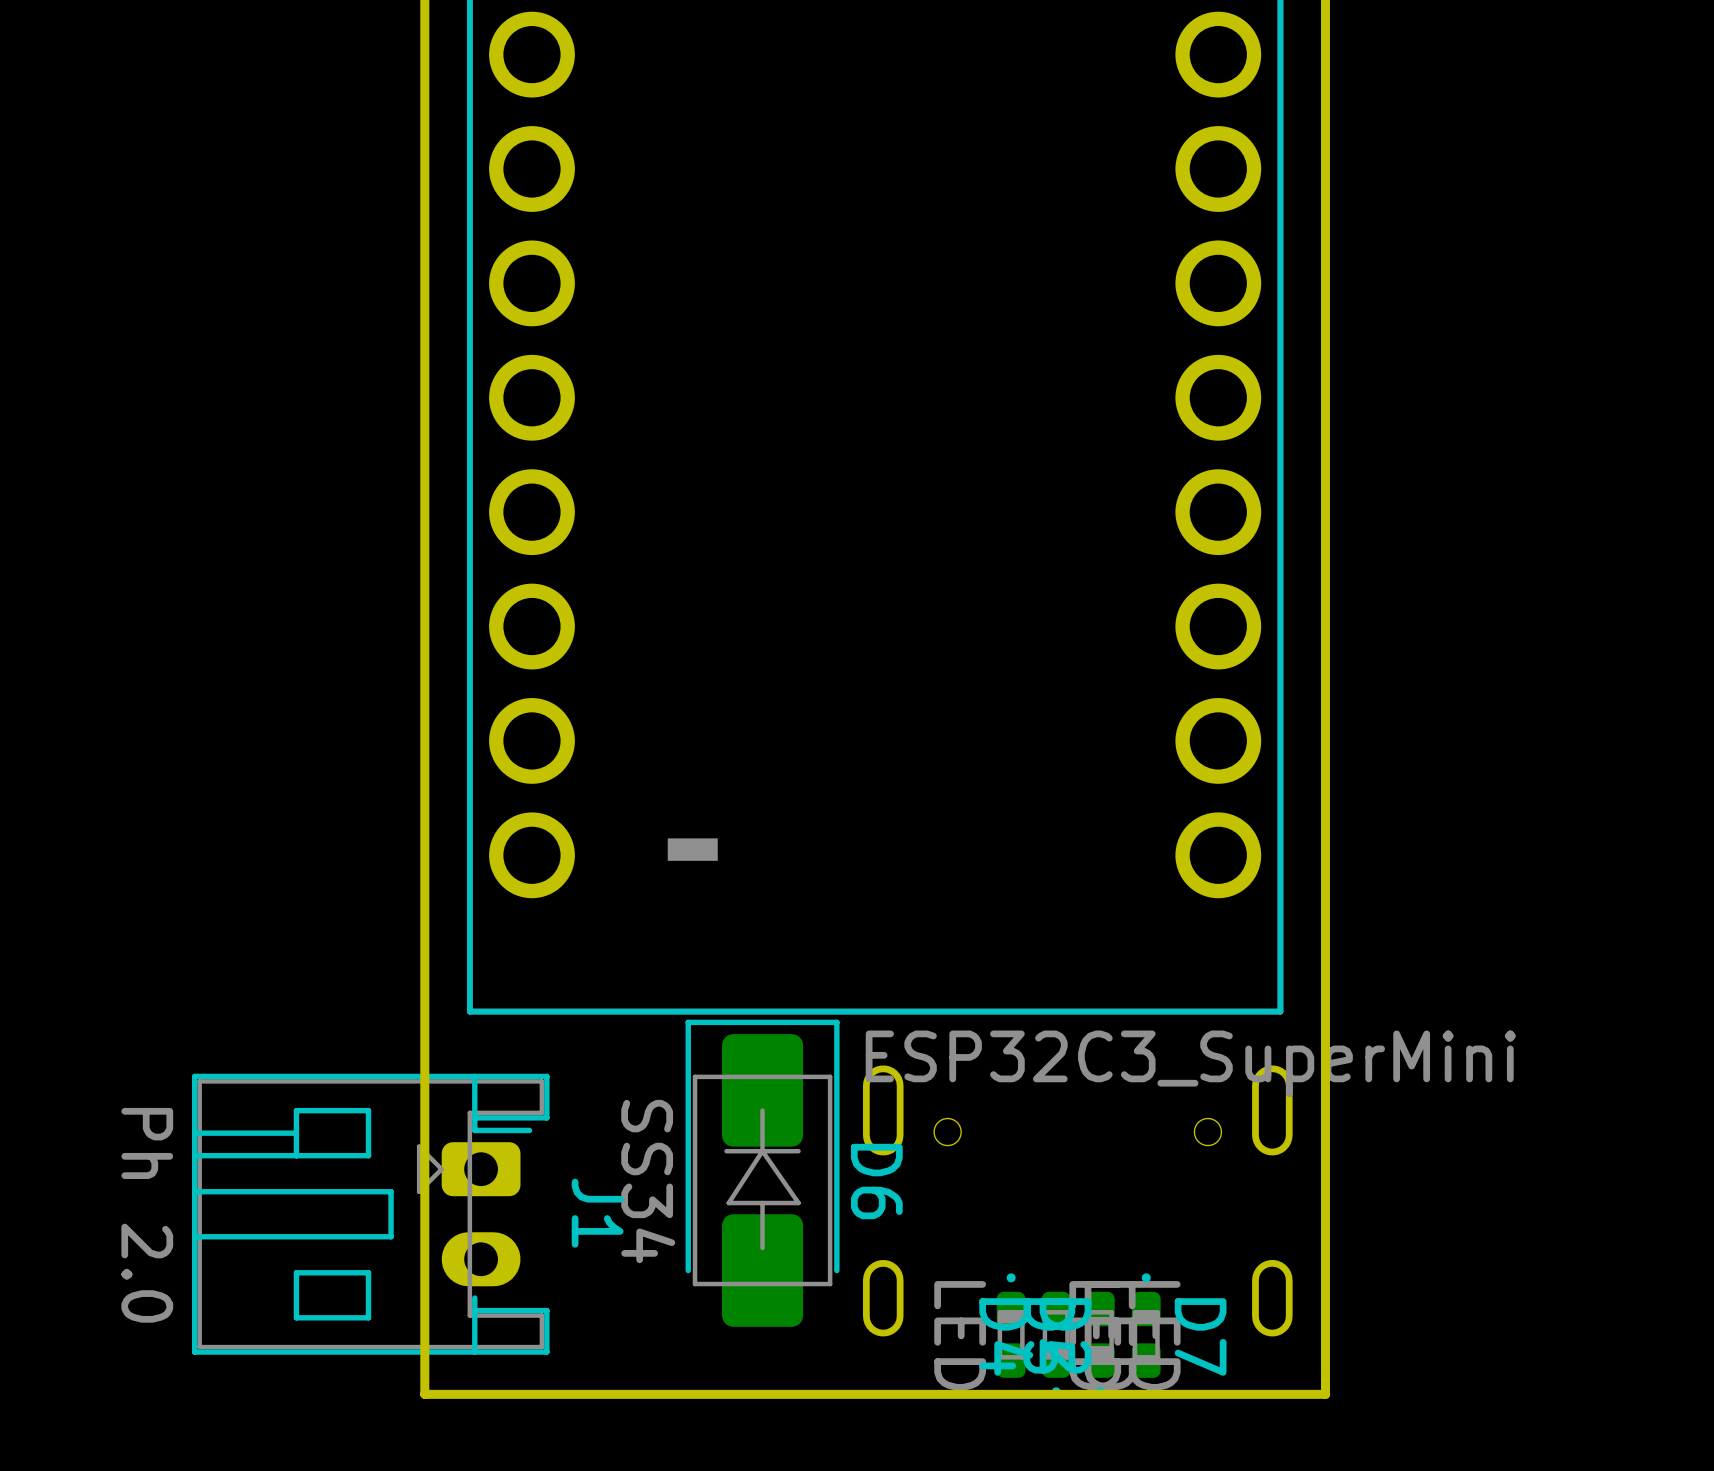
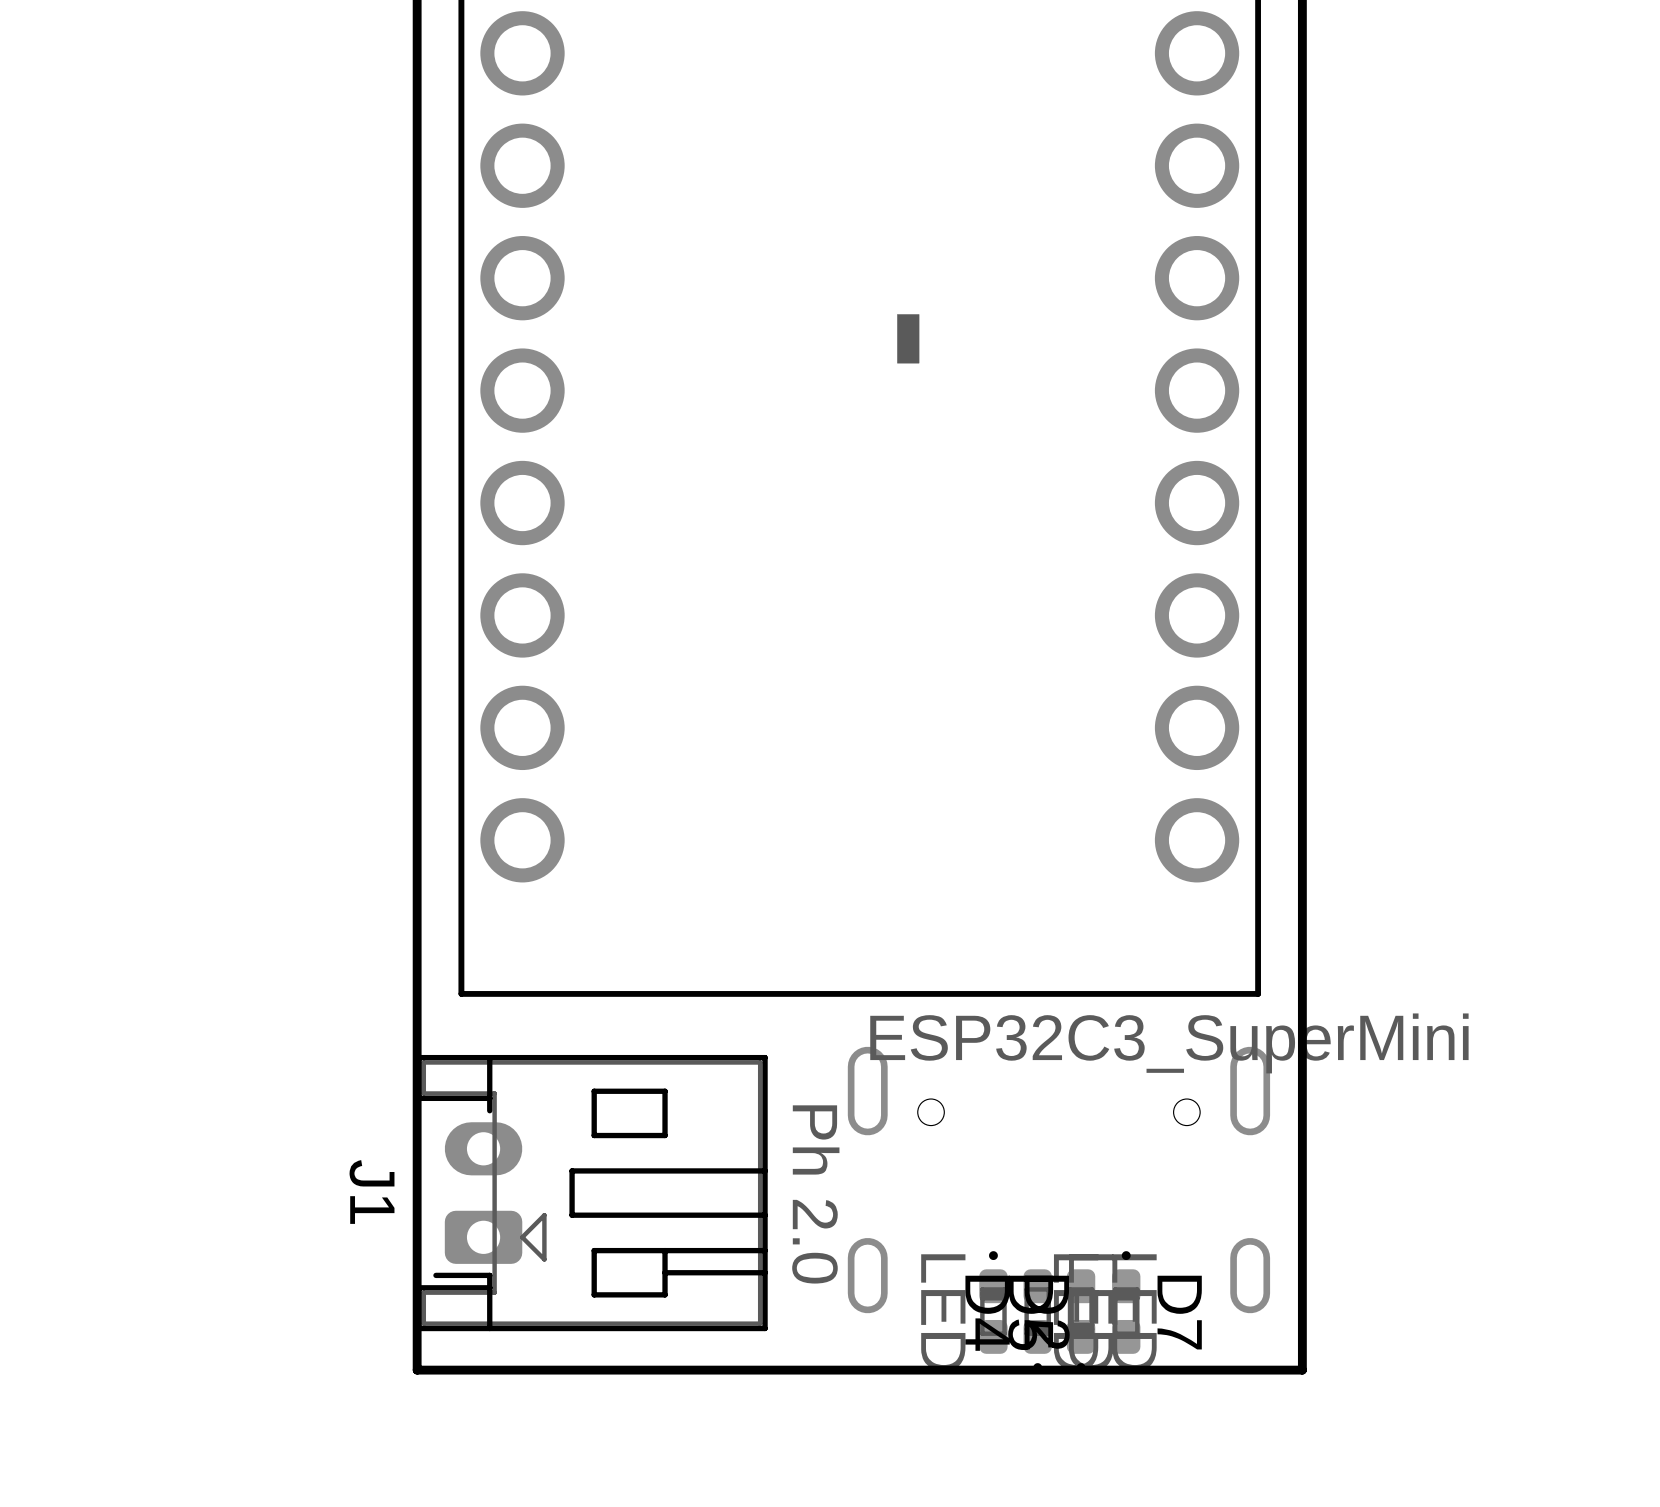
part rotation: 0° (692, 849) -> 90° clockwise (908, 338)
part position: (692, 849) -> (908, 338)
D6: SS34 (762, 1173) -> none
J1 rotation: 0° (370, 1214) -> 180° (591, 1193)
J1 position: (370, 1214) -> (591, 1193)

